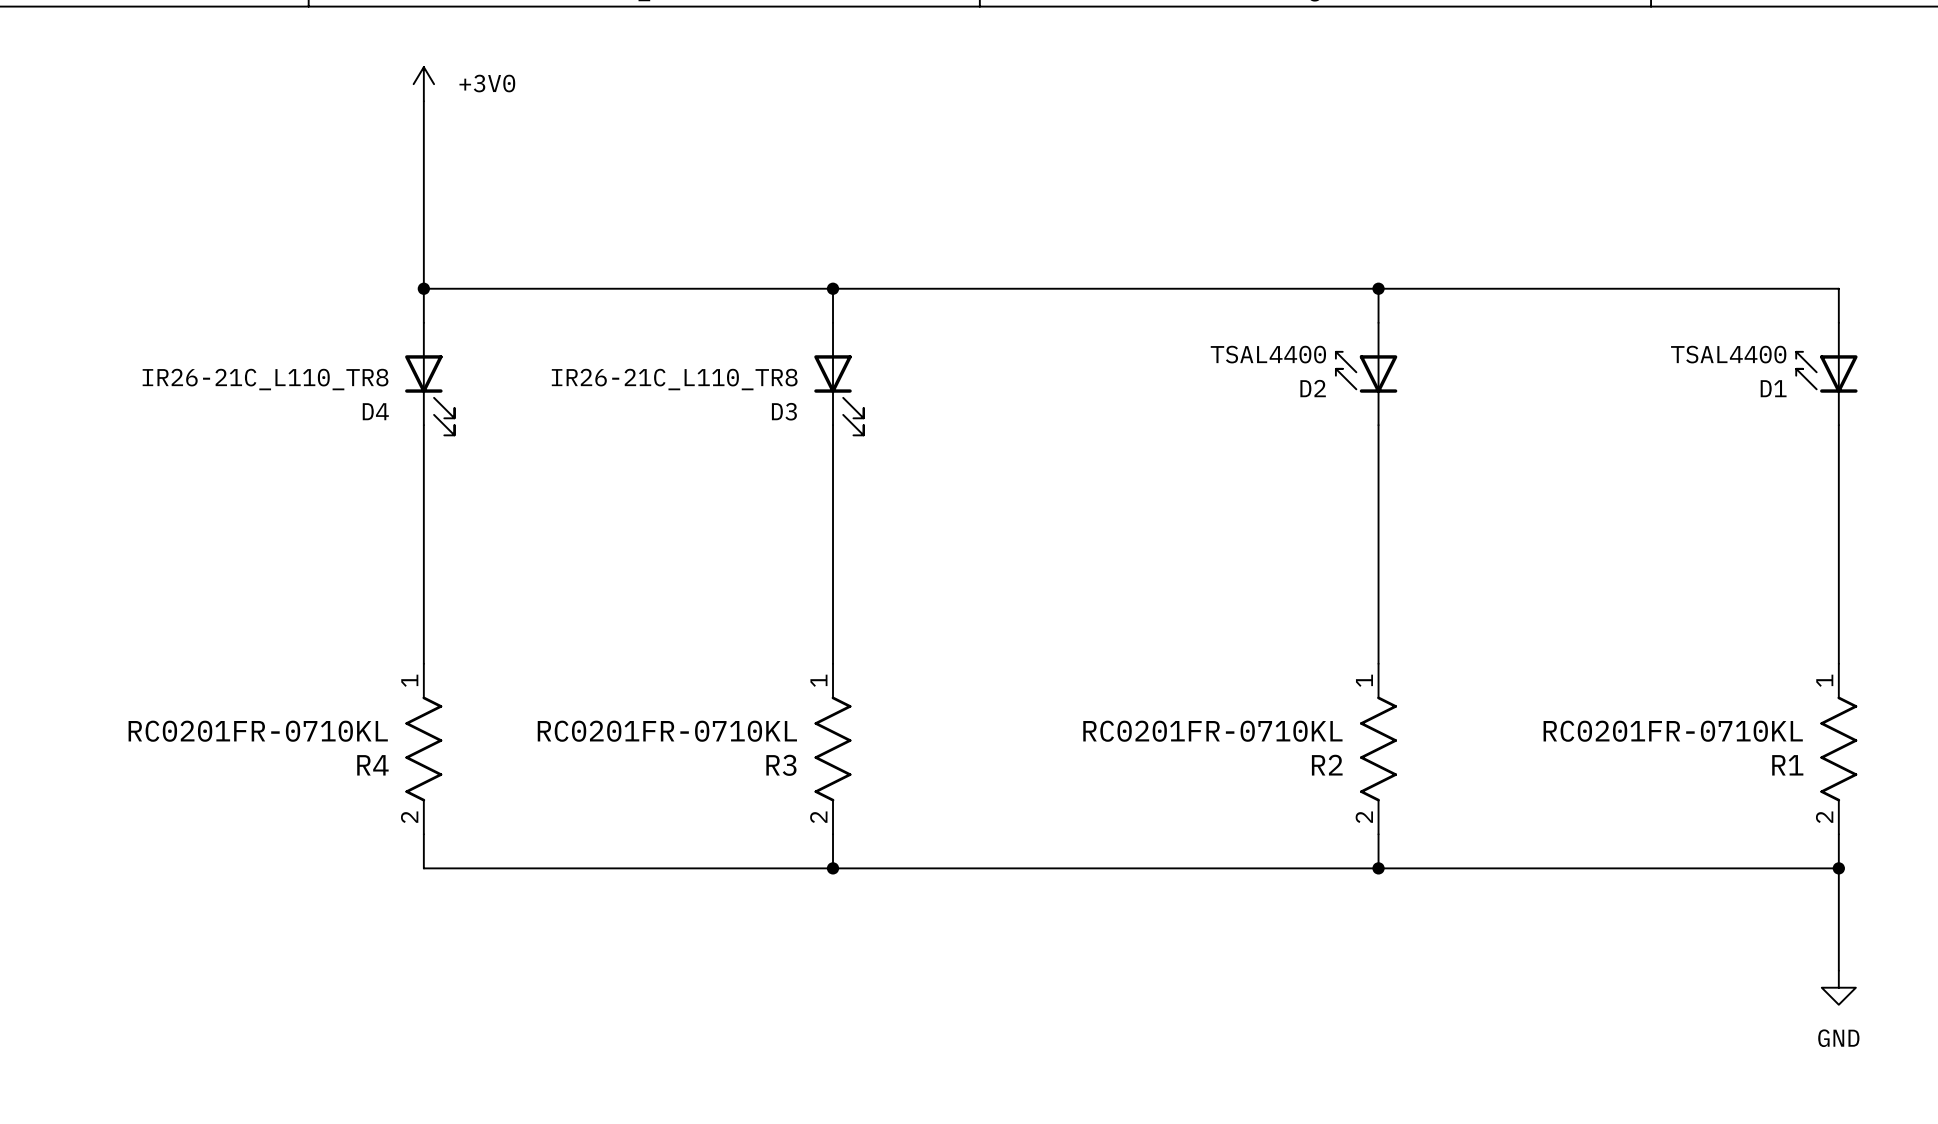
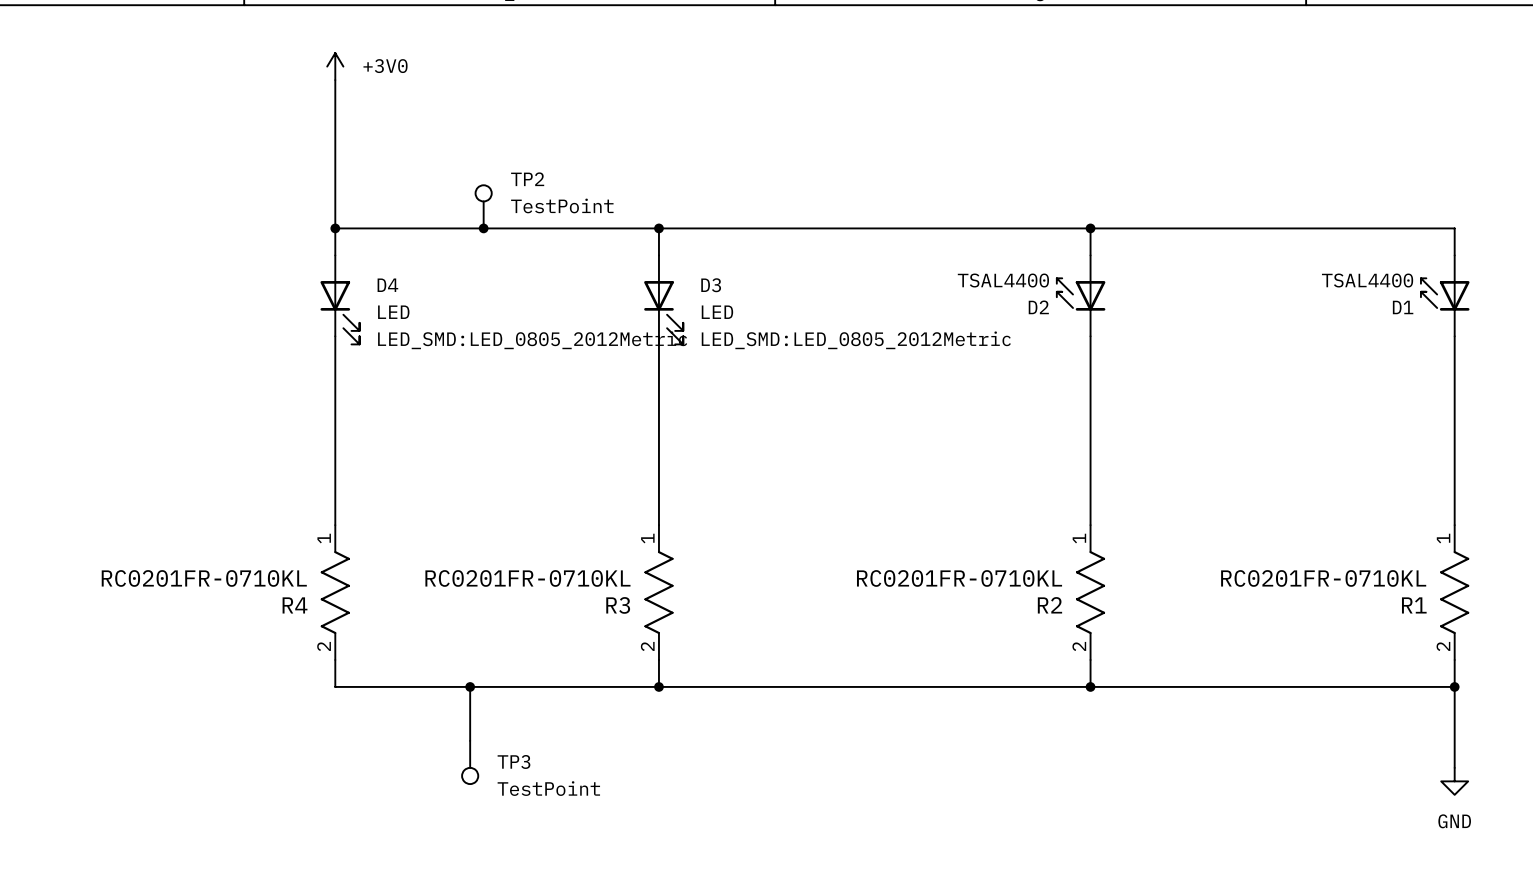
TP2: none -> TestPoint (483, 206)
junction: none -> (483, 228)
D4 value: IR26-21C_L110_TR8 (265, 379) -> LED (393, 312)
D3 value: IR26-21C_L110_TR8 (674, 379) -> LED (717, 312)
D4 name position: D4 (375, 411) -> D4 (387, 285)
D3 name position: D3 (784, 411) -> D3 (711, 285)
D4 text: none -> LED_SMD:LED_0805_2012Metric (532, 340)
D3 text: none -> LED_SMD:LED_0805_2012Metric (856, 340)
wire: none -> (470, 686) (470, 740)
junction: none -> (470, 686)
TP3: none -> TestPoint (470, 762)

